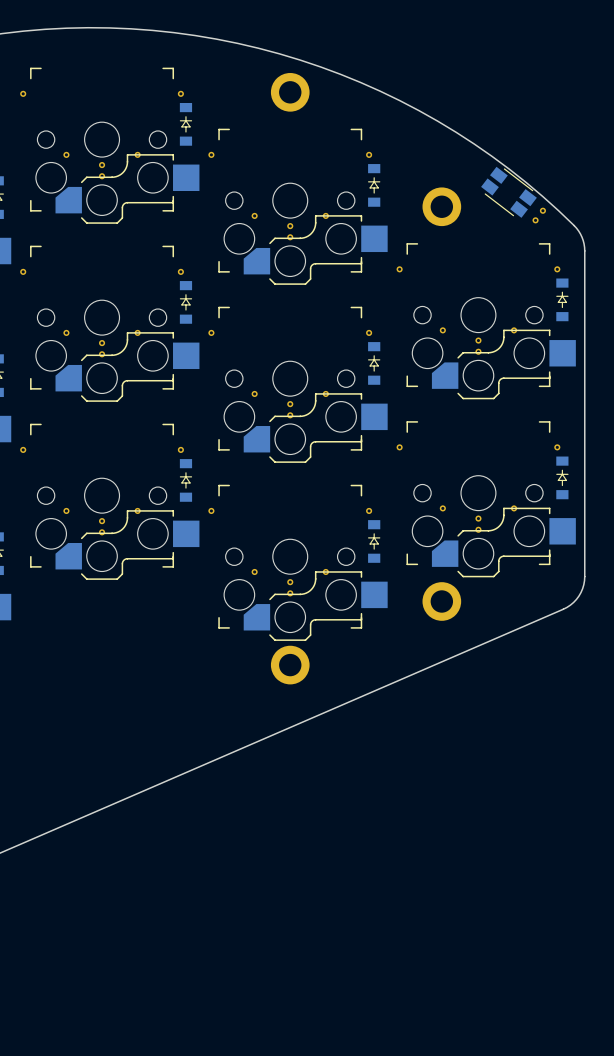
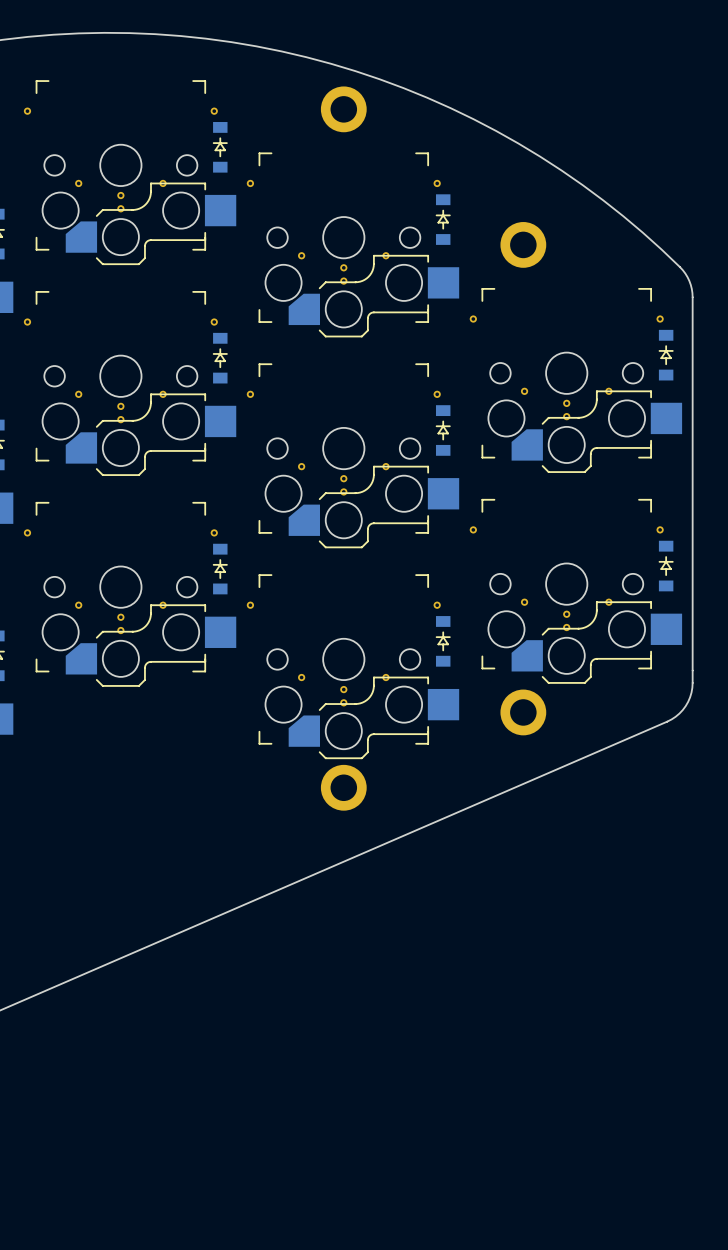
part: (508, 192) -> none
part: (542, 210) -> none
part: (535, 220) -> none

